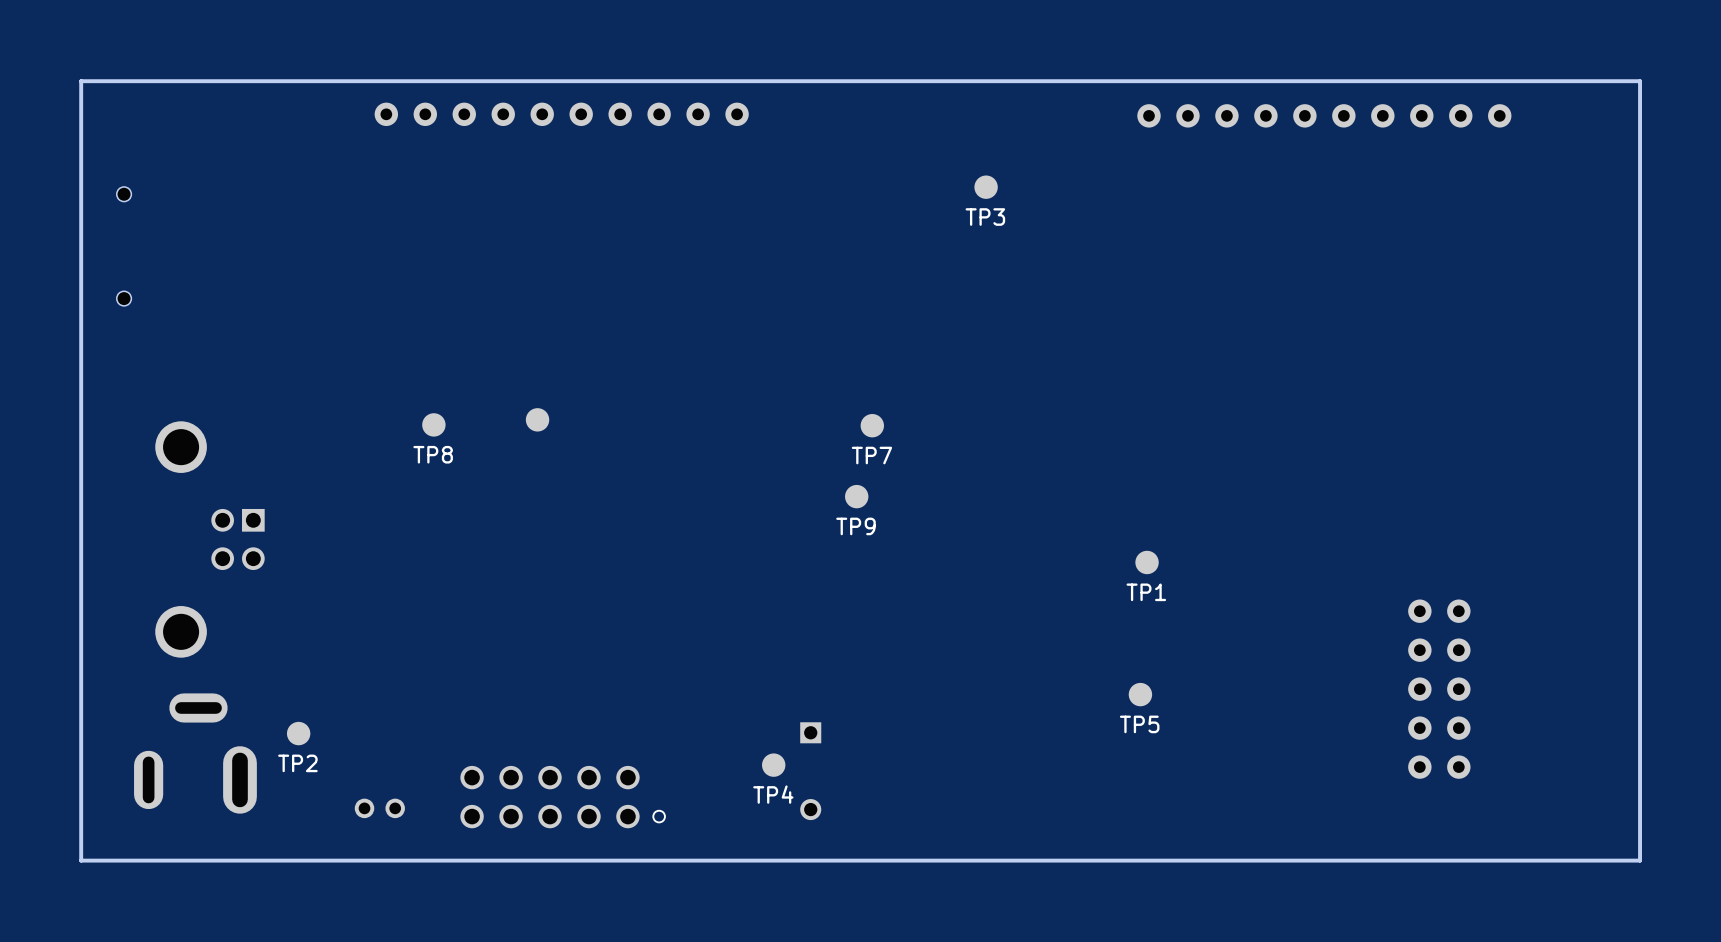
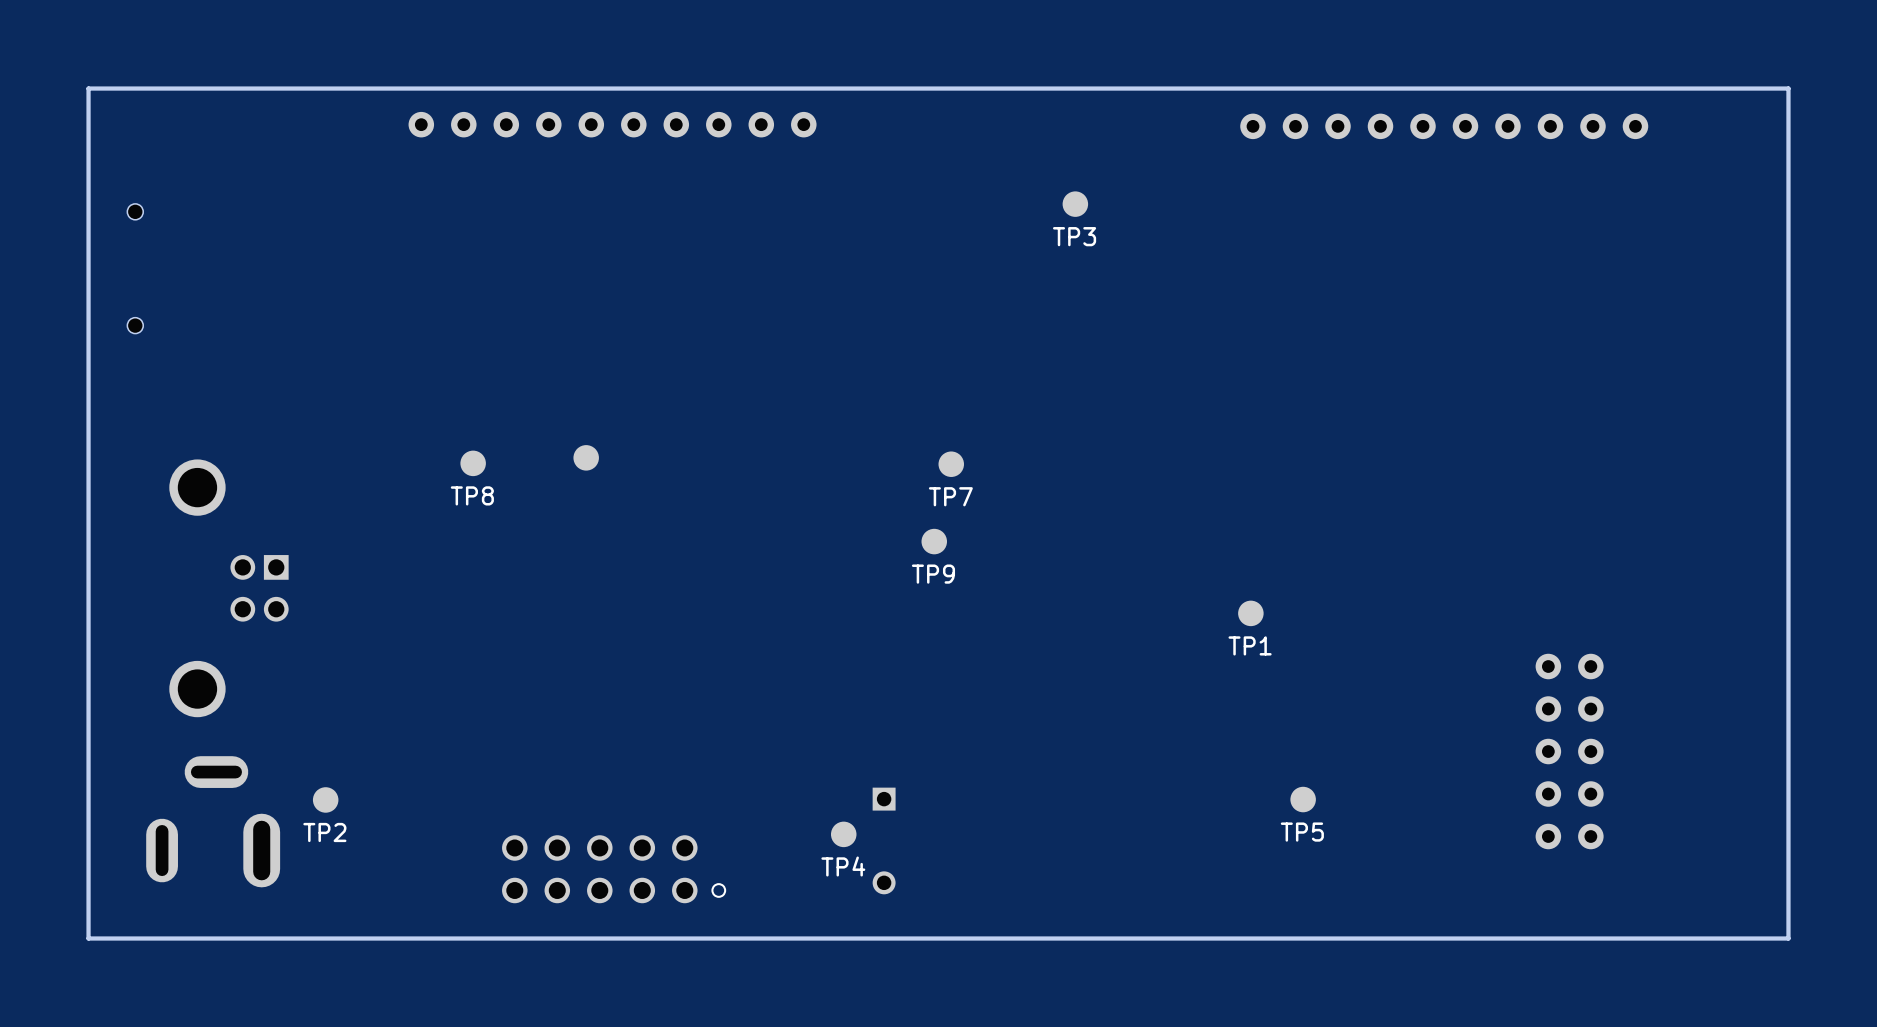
TP5 position: (1140, 694) -> (1303, 799)
part: (379, 808) -> none

